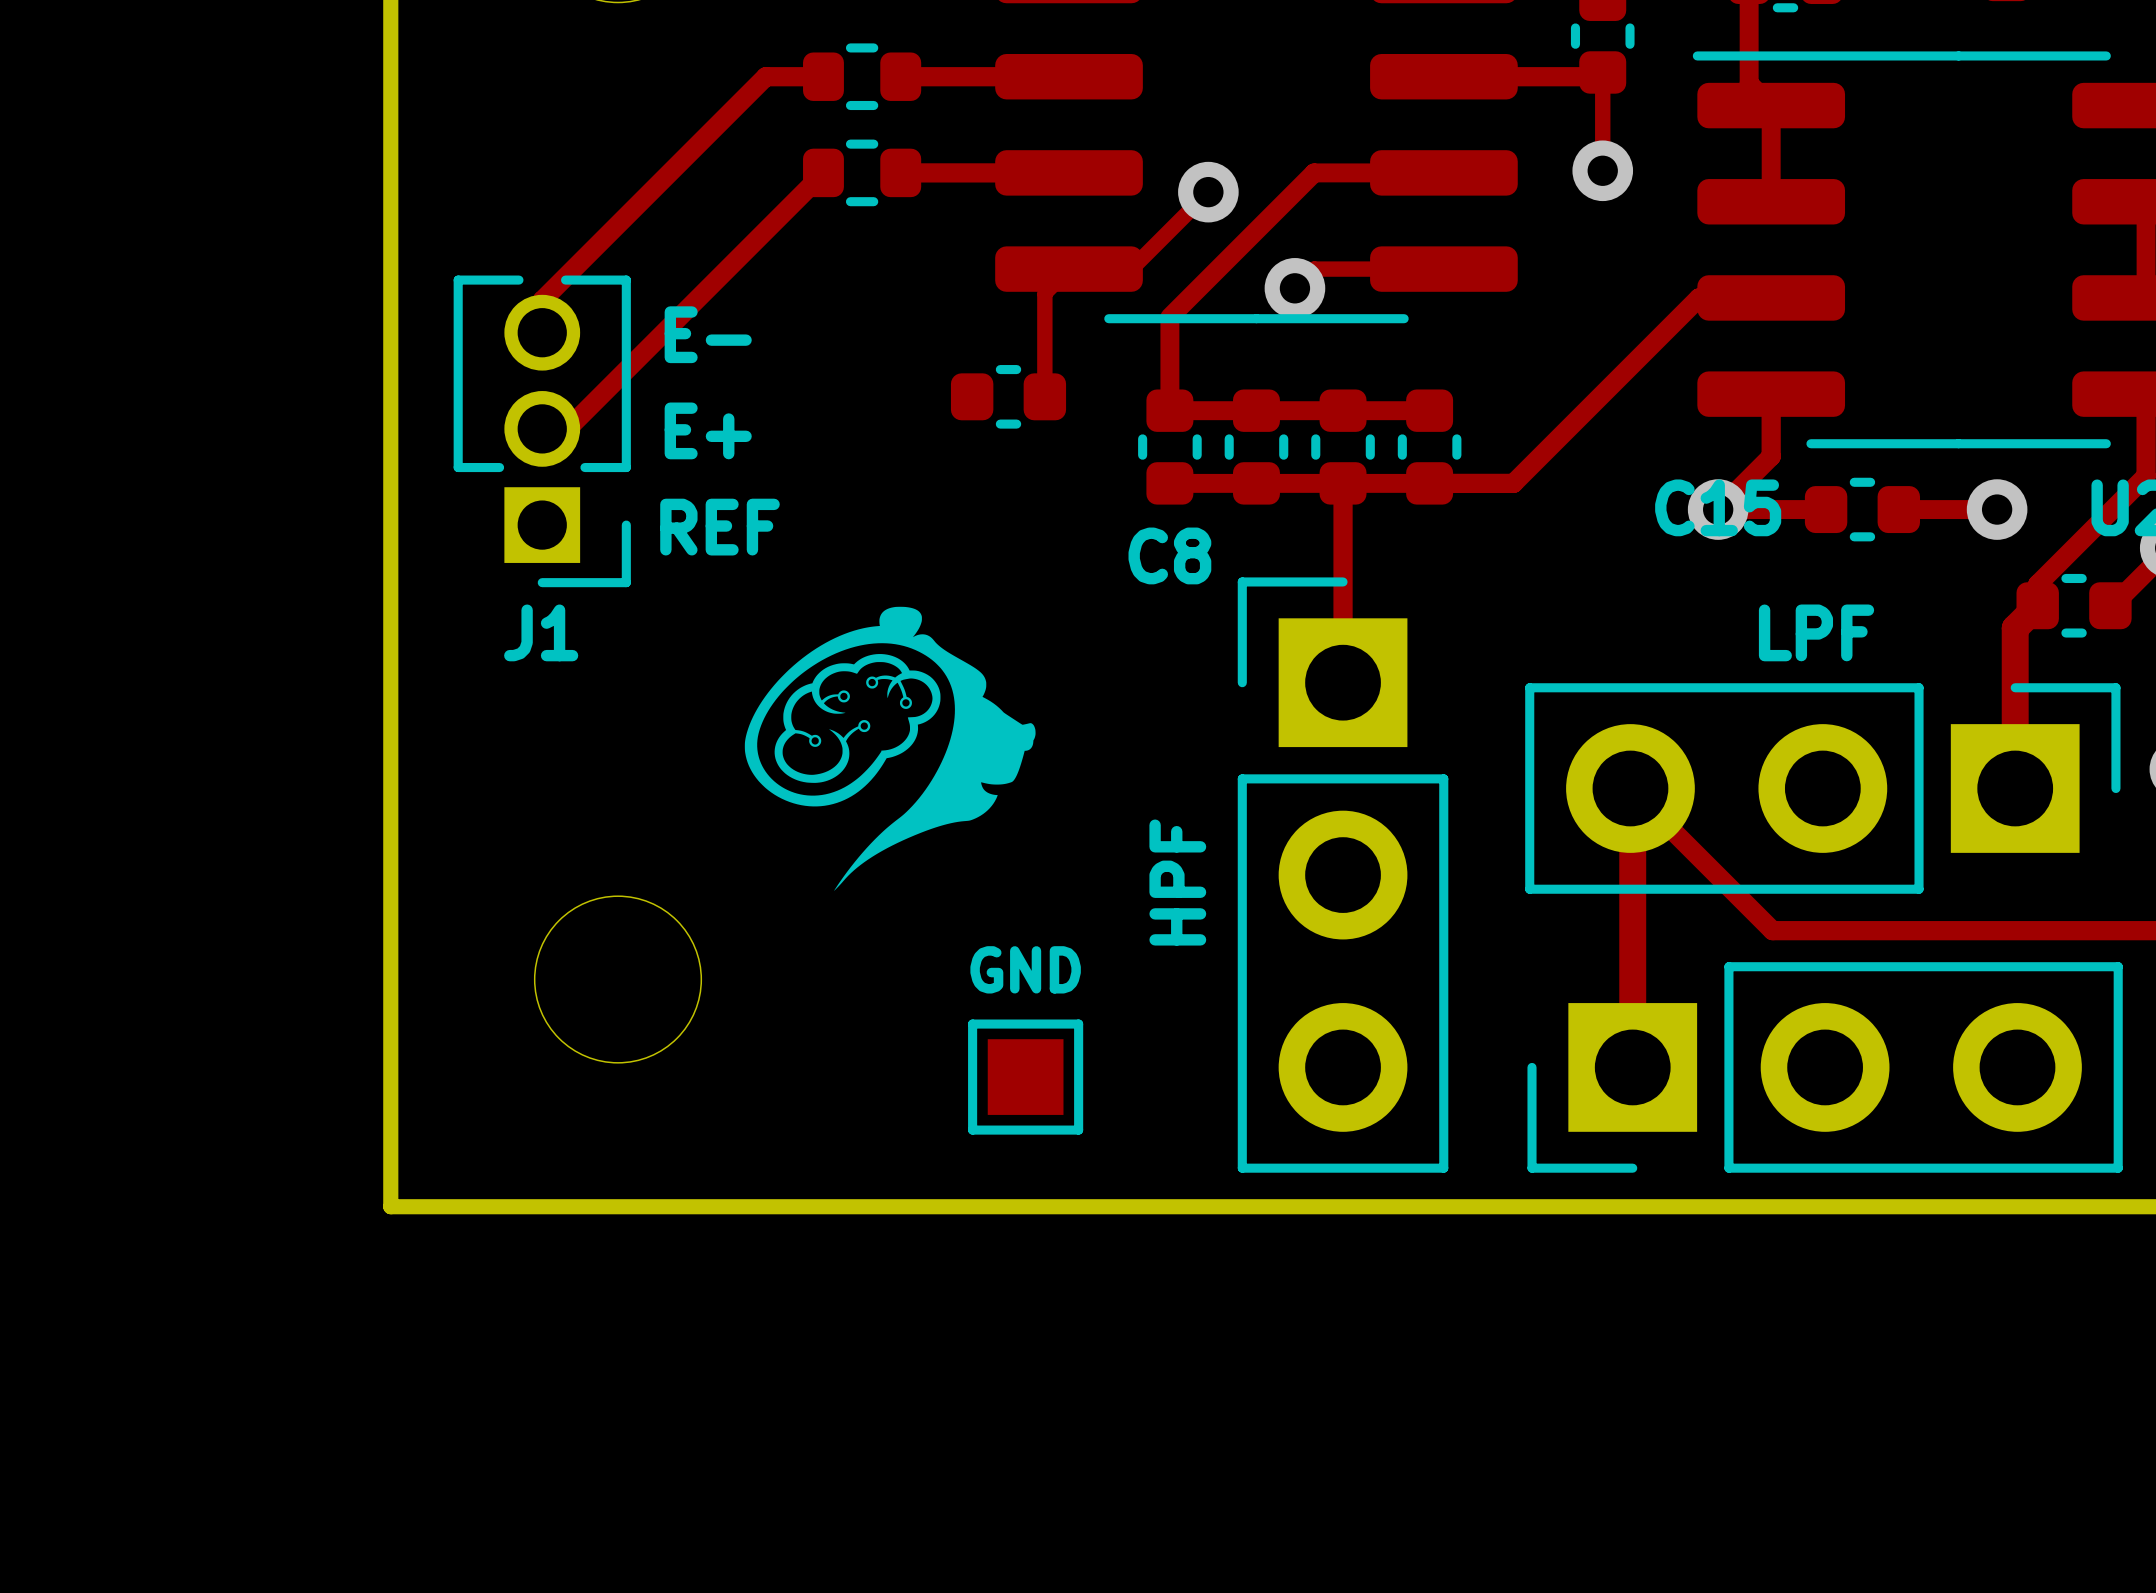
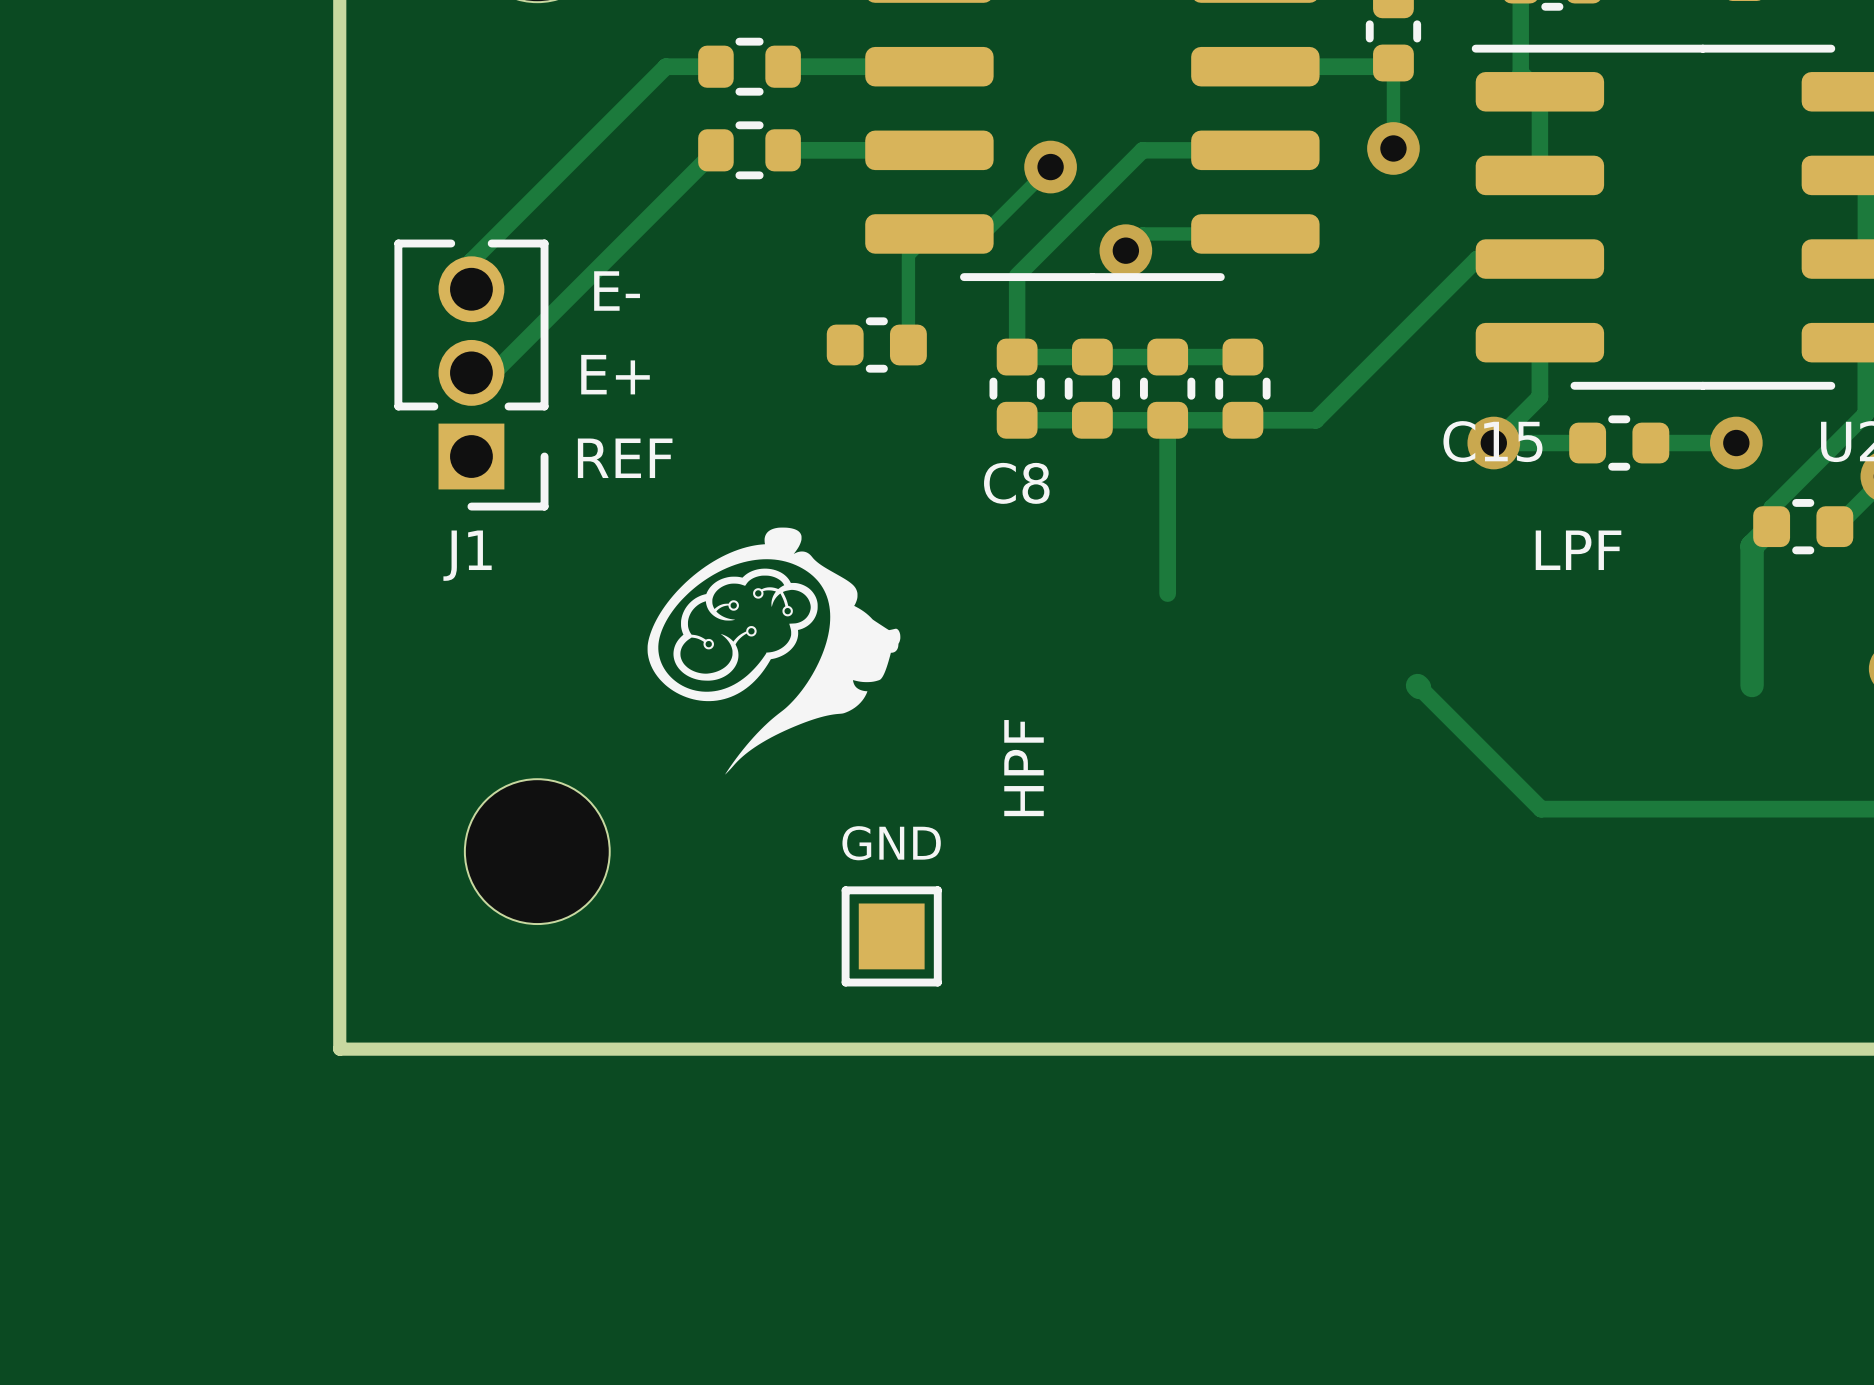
part: (1822, 788) -> none
track: (1632, 790) (1632, 1067) -> none
part: (1343, 875) -> none
part: (1825, 1067) -> none

